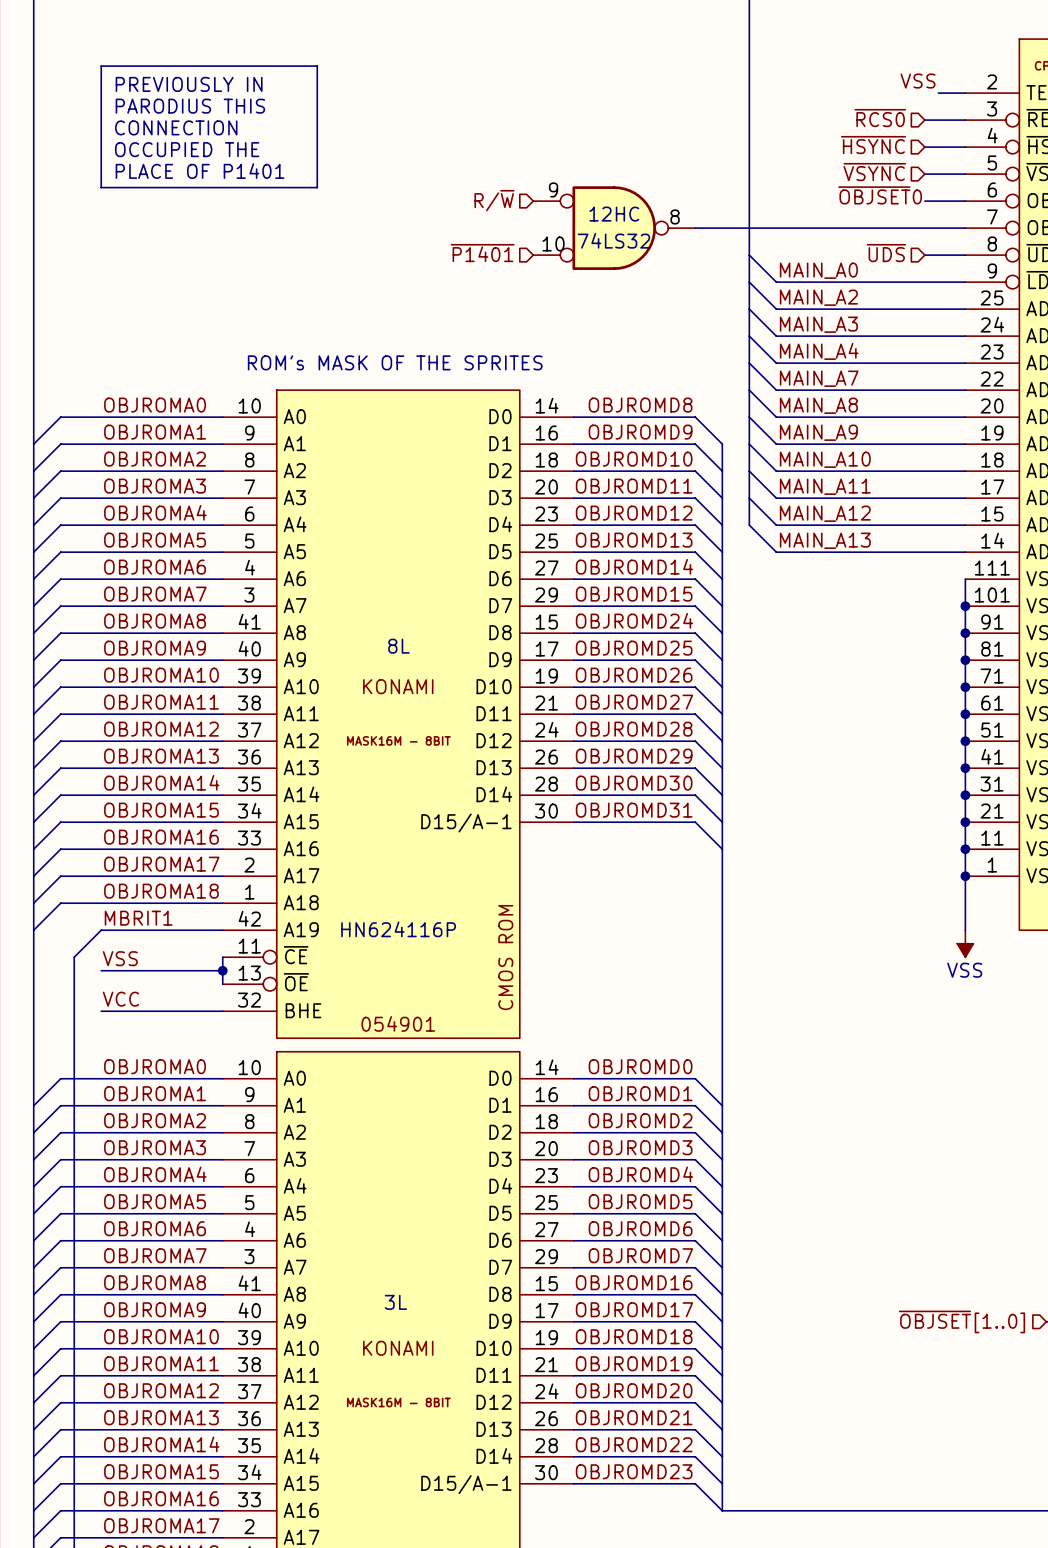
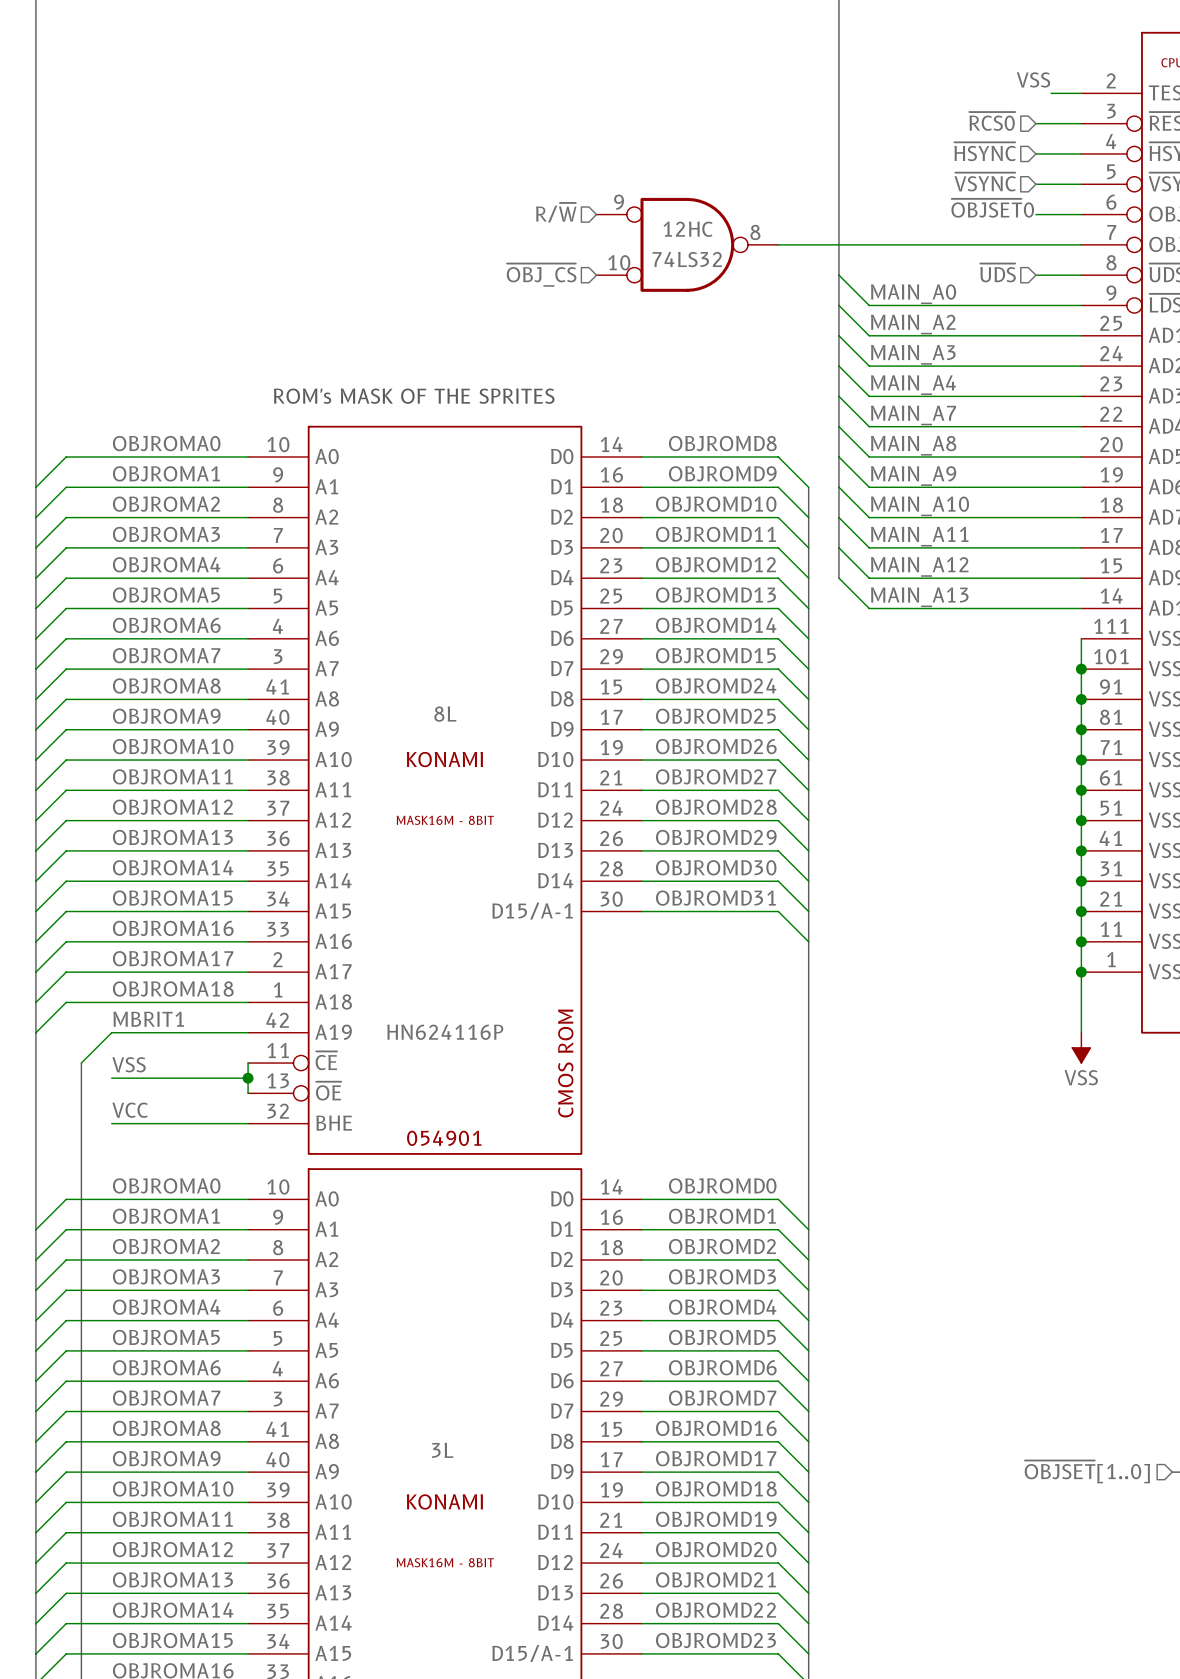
line: (101, 66) (317, 66) (317, 187) (101, 187) (101, 66) -> none
text: PREVIOUSLY IN (189, 84) -> none
text: PARODIUS THIS (190, 106) -> none
text: CONNECTION (176, 127) -> none
text: OCCUPIED THE (187, 149) -> none
text: PLACE OF P1401 (200, 171) -> none
hierarchical label: ~{P1401} (482, 253) -> ~{OBJ_CS} (541, 275)

